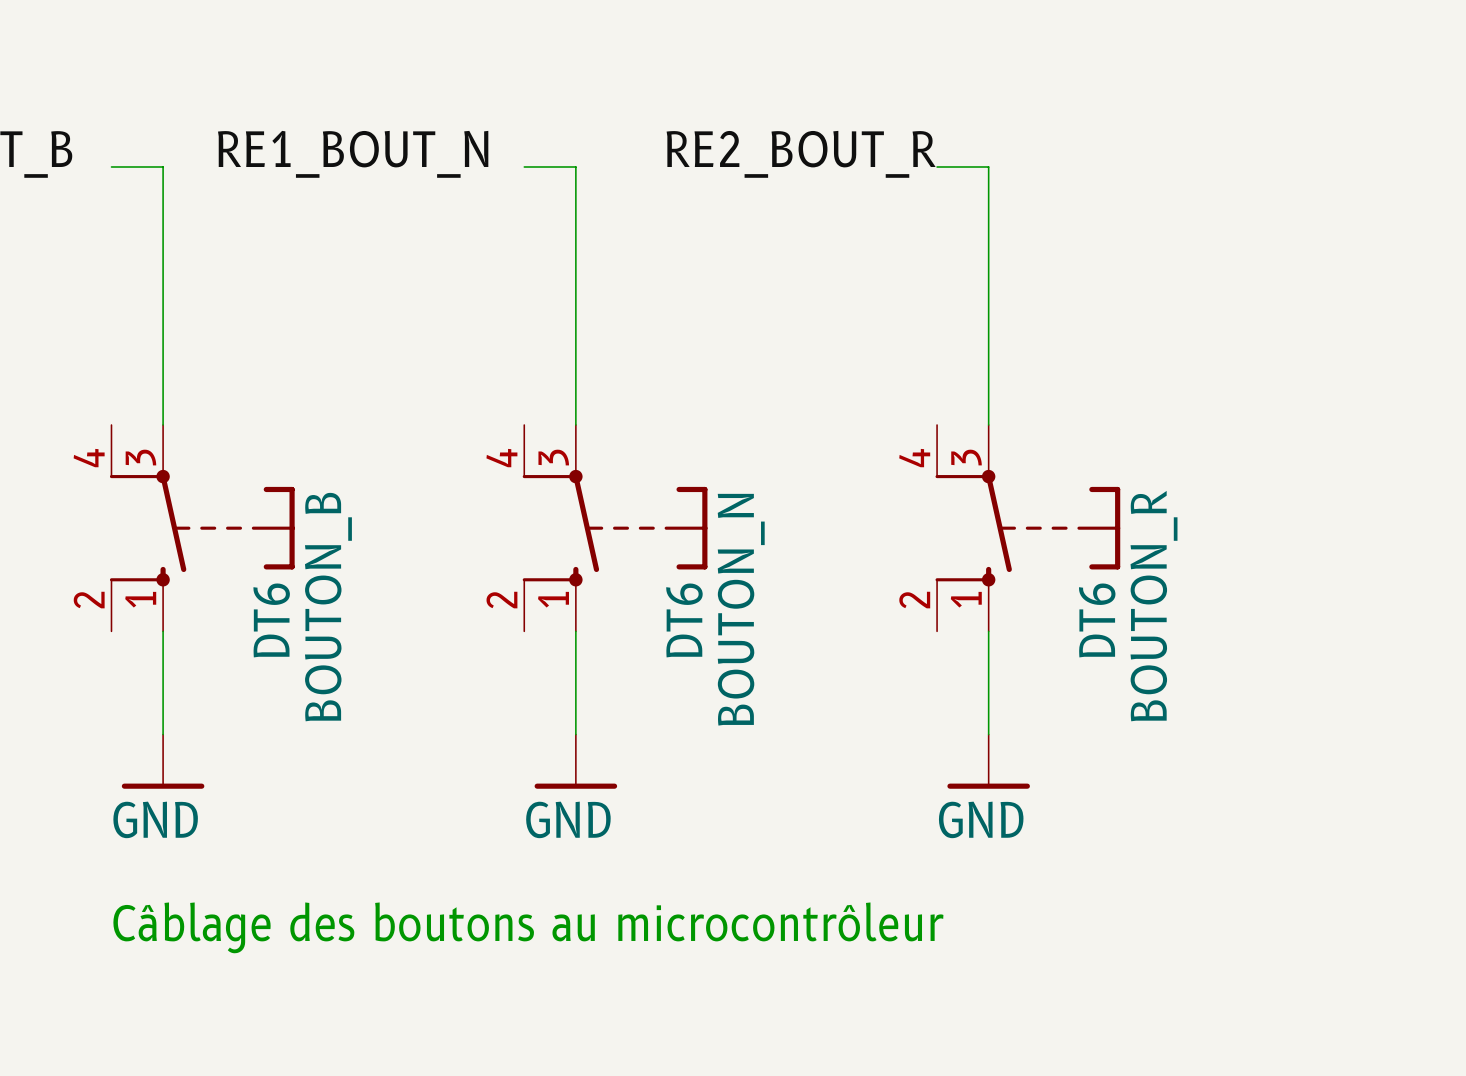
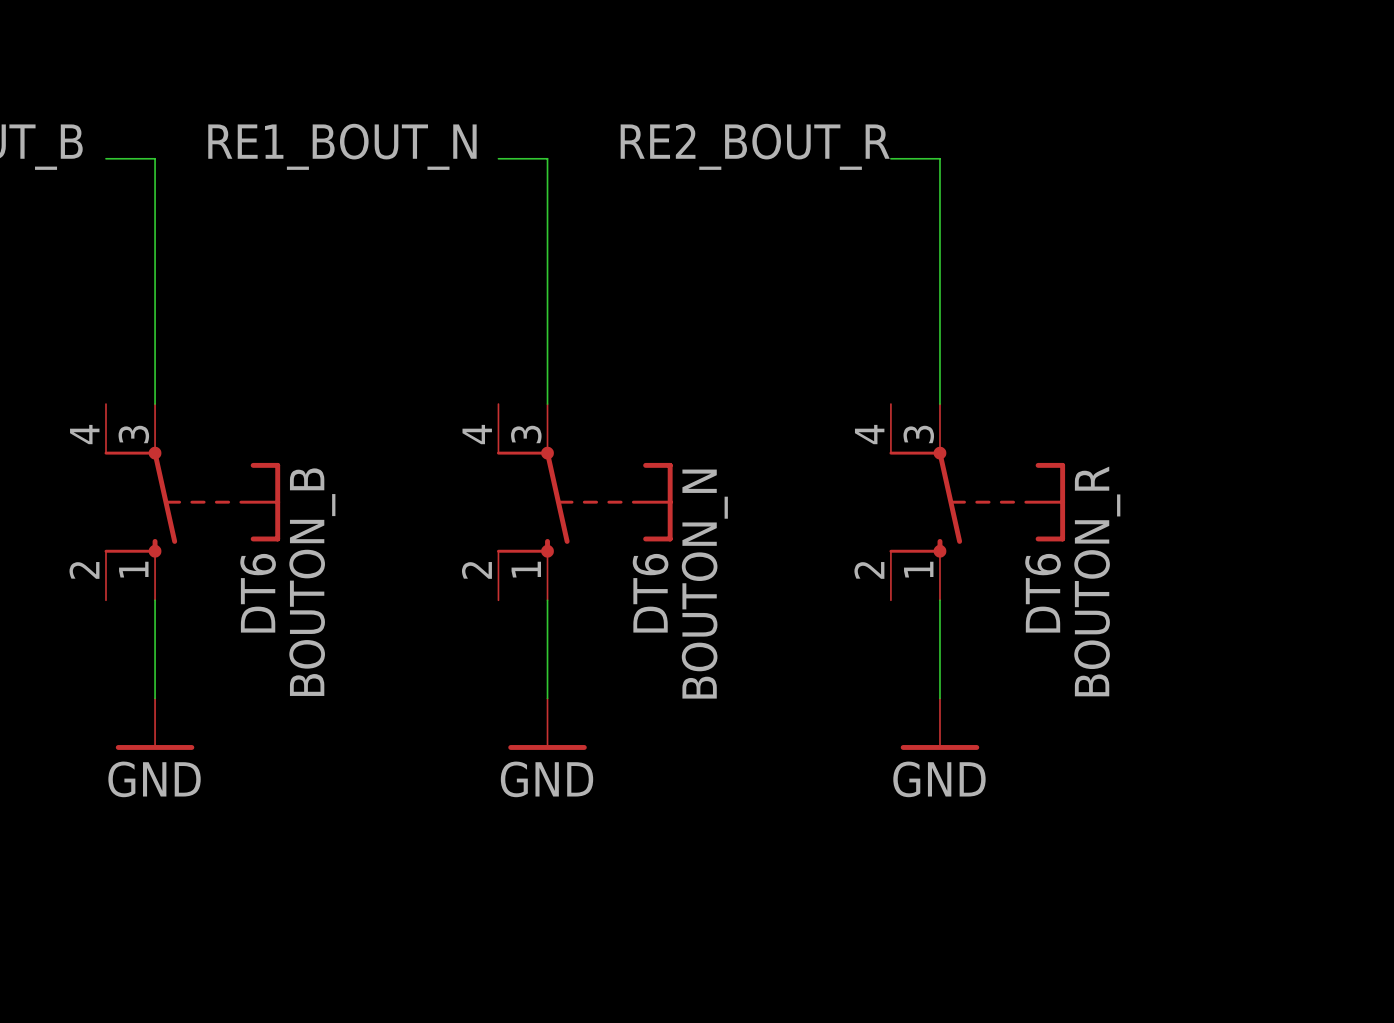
text: Câblage des boutons au microcontrôleur (528, 927) -> none

